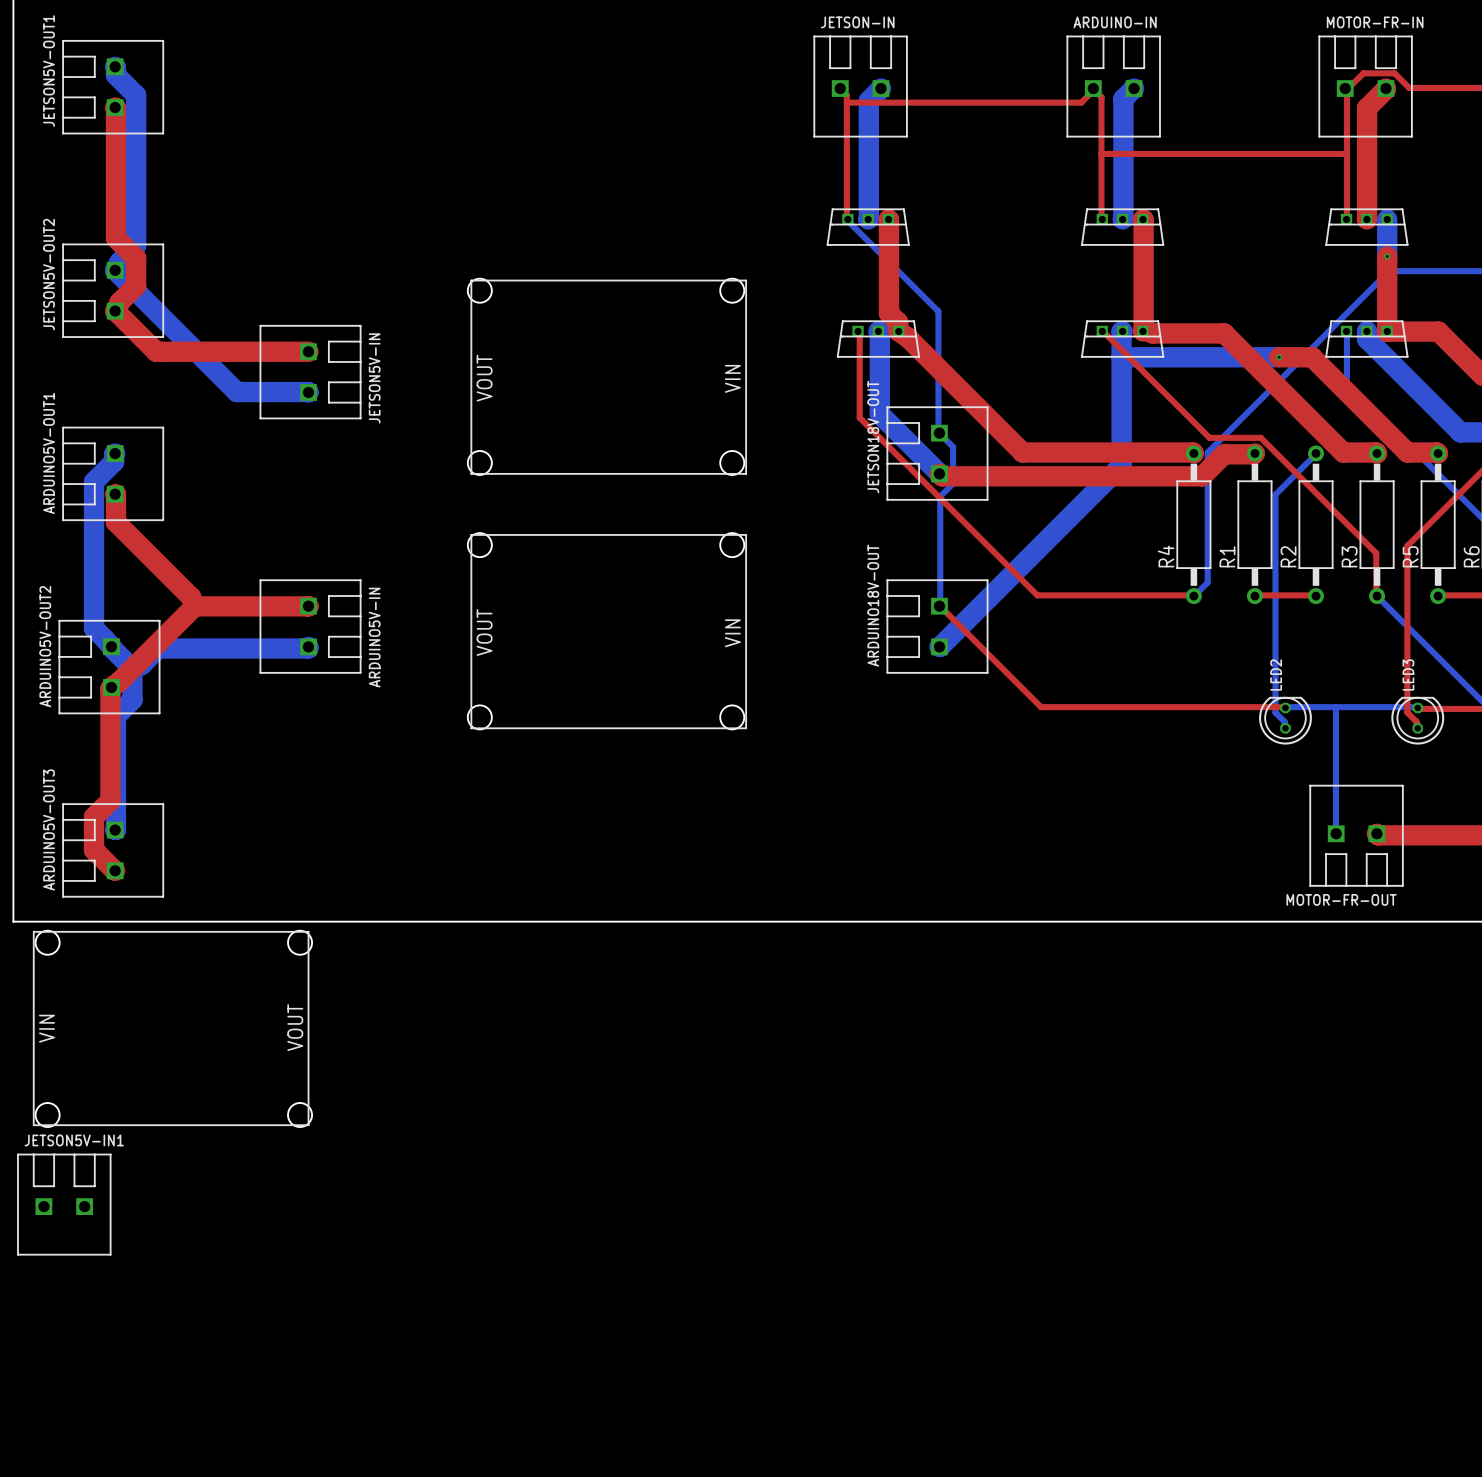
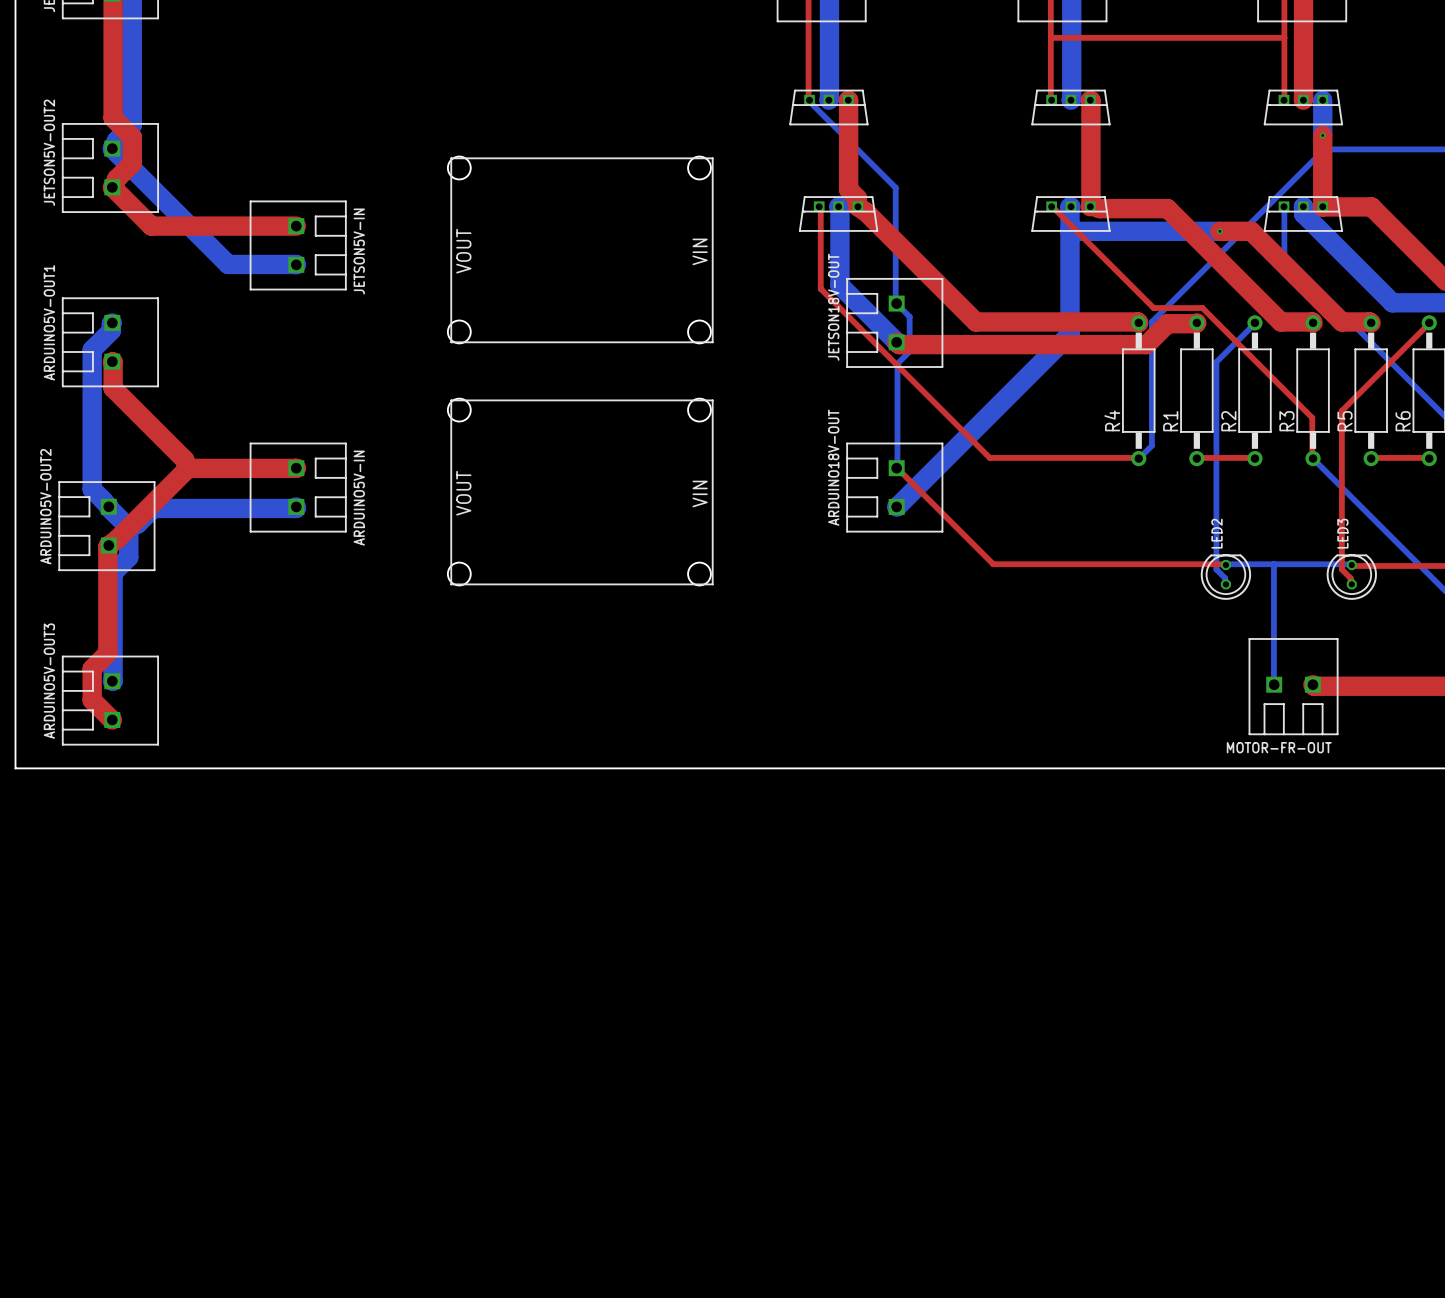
part: (172, 1028) -> none
JETSON5V-IN1: (64, 1204) -> none

